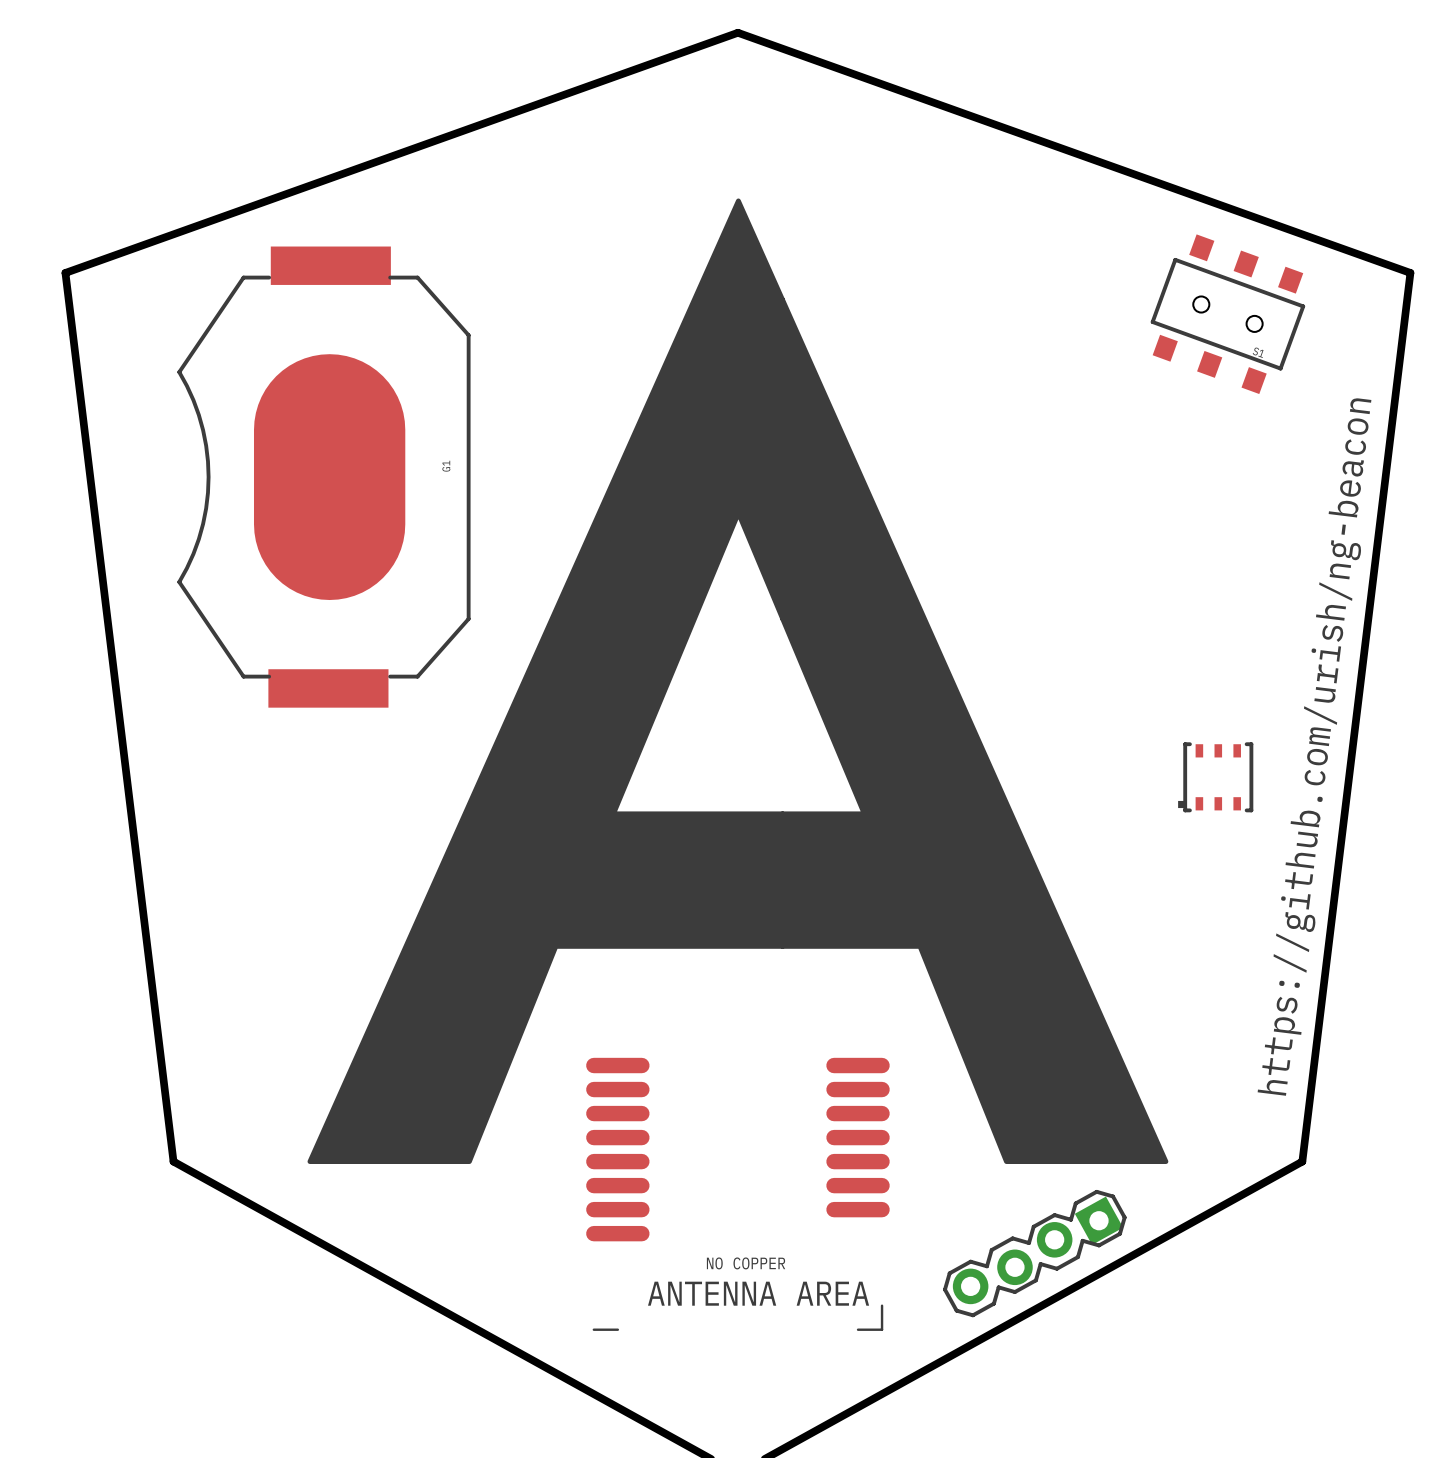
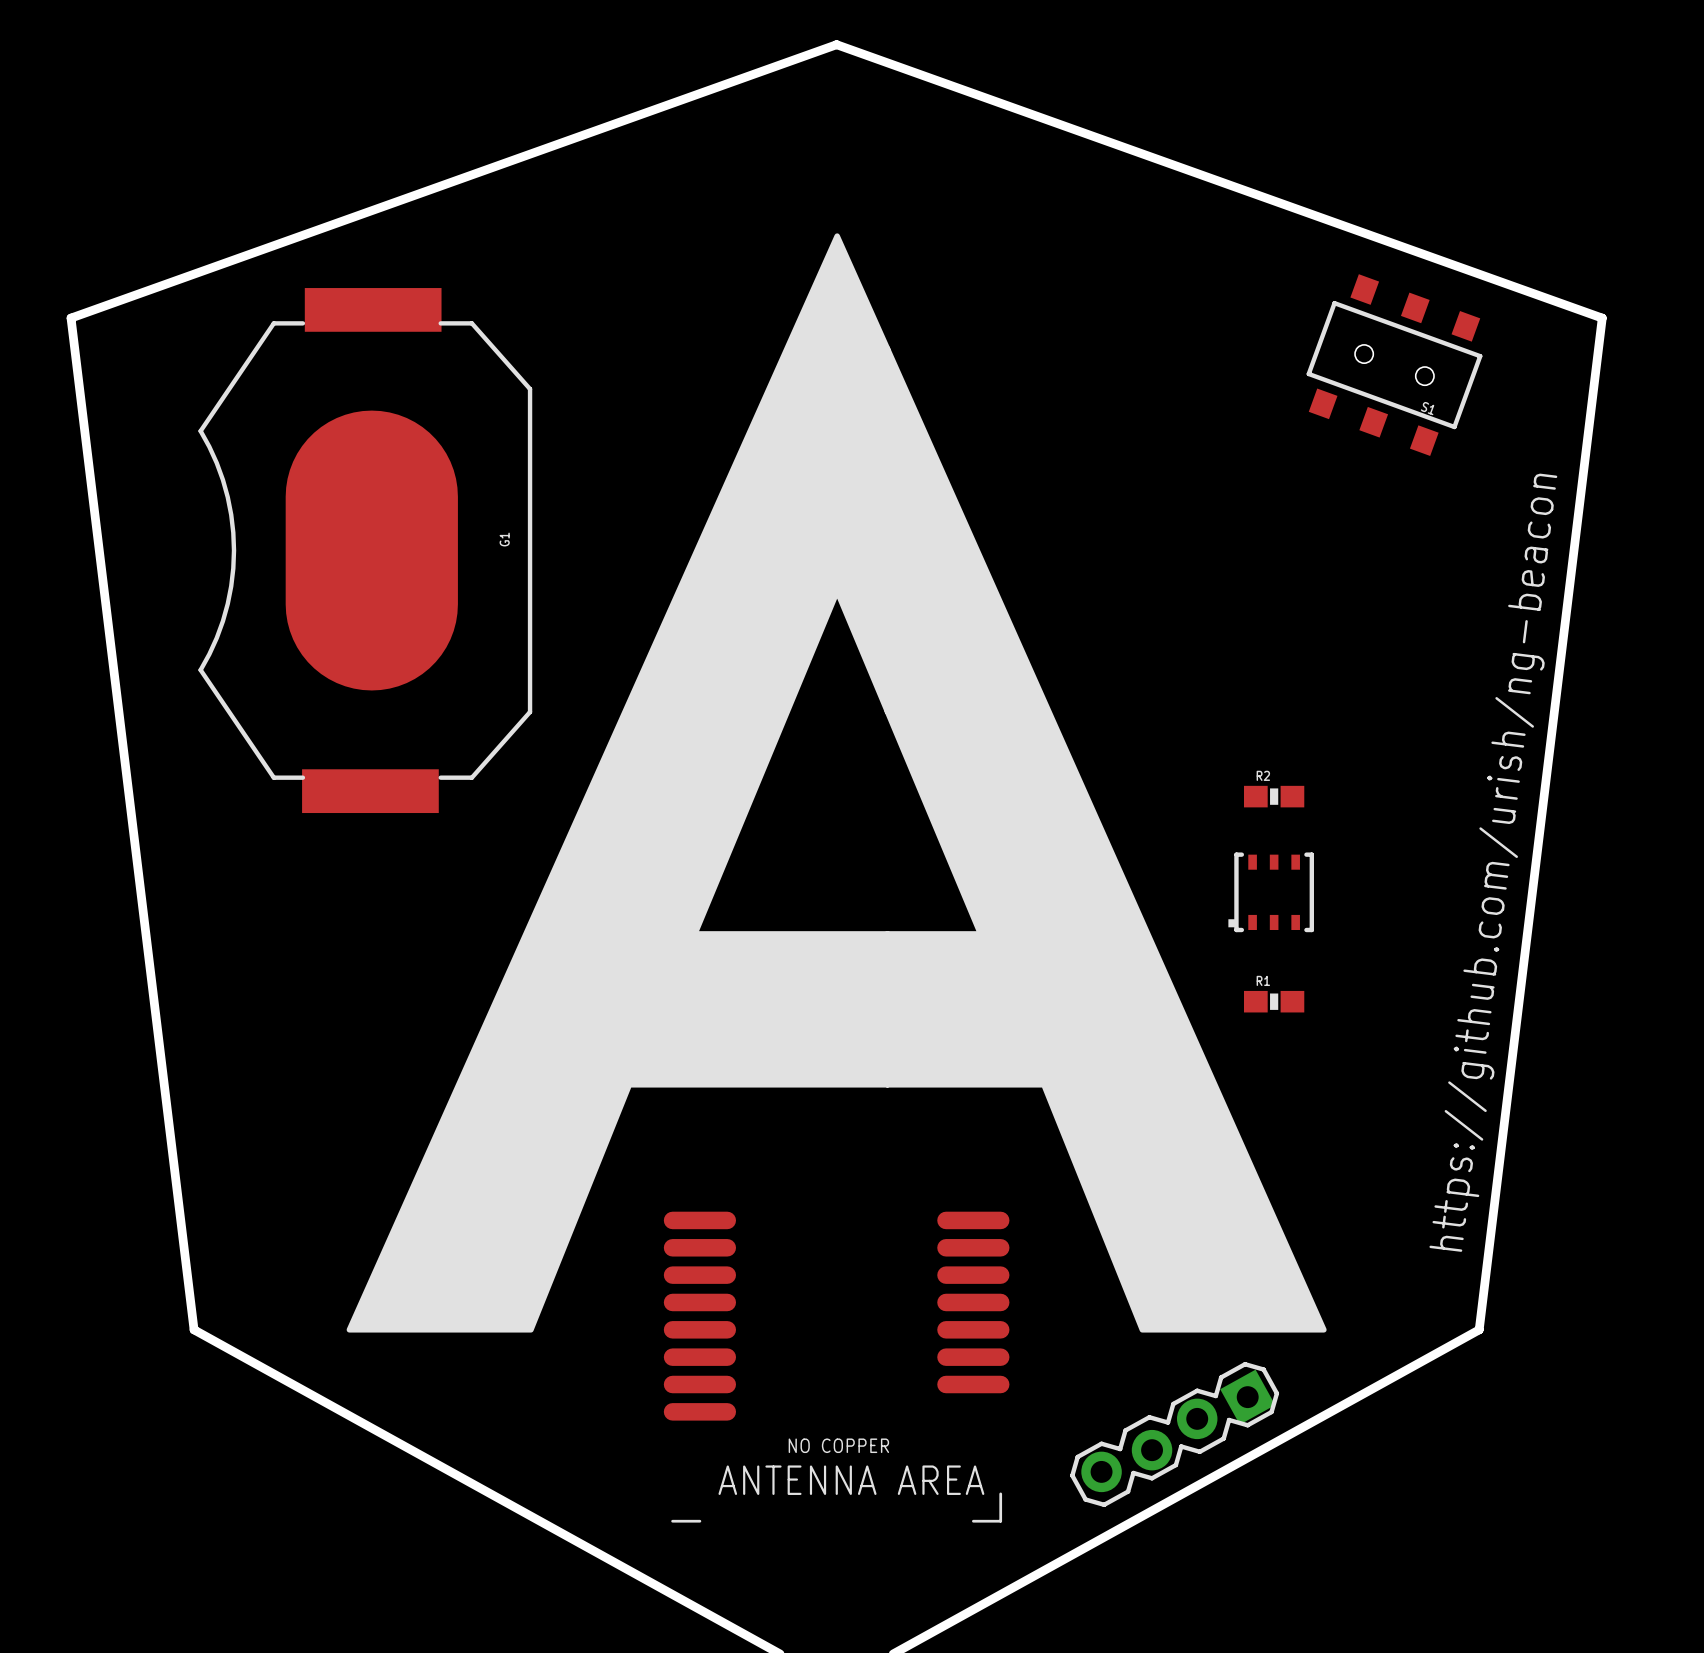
R2: none -> (1274, 796)
part position: (1215, 777) -> (1271, 892)
R1: none -> (1274, 1001)

